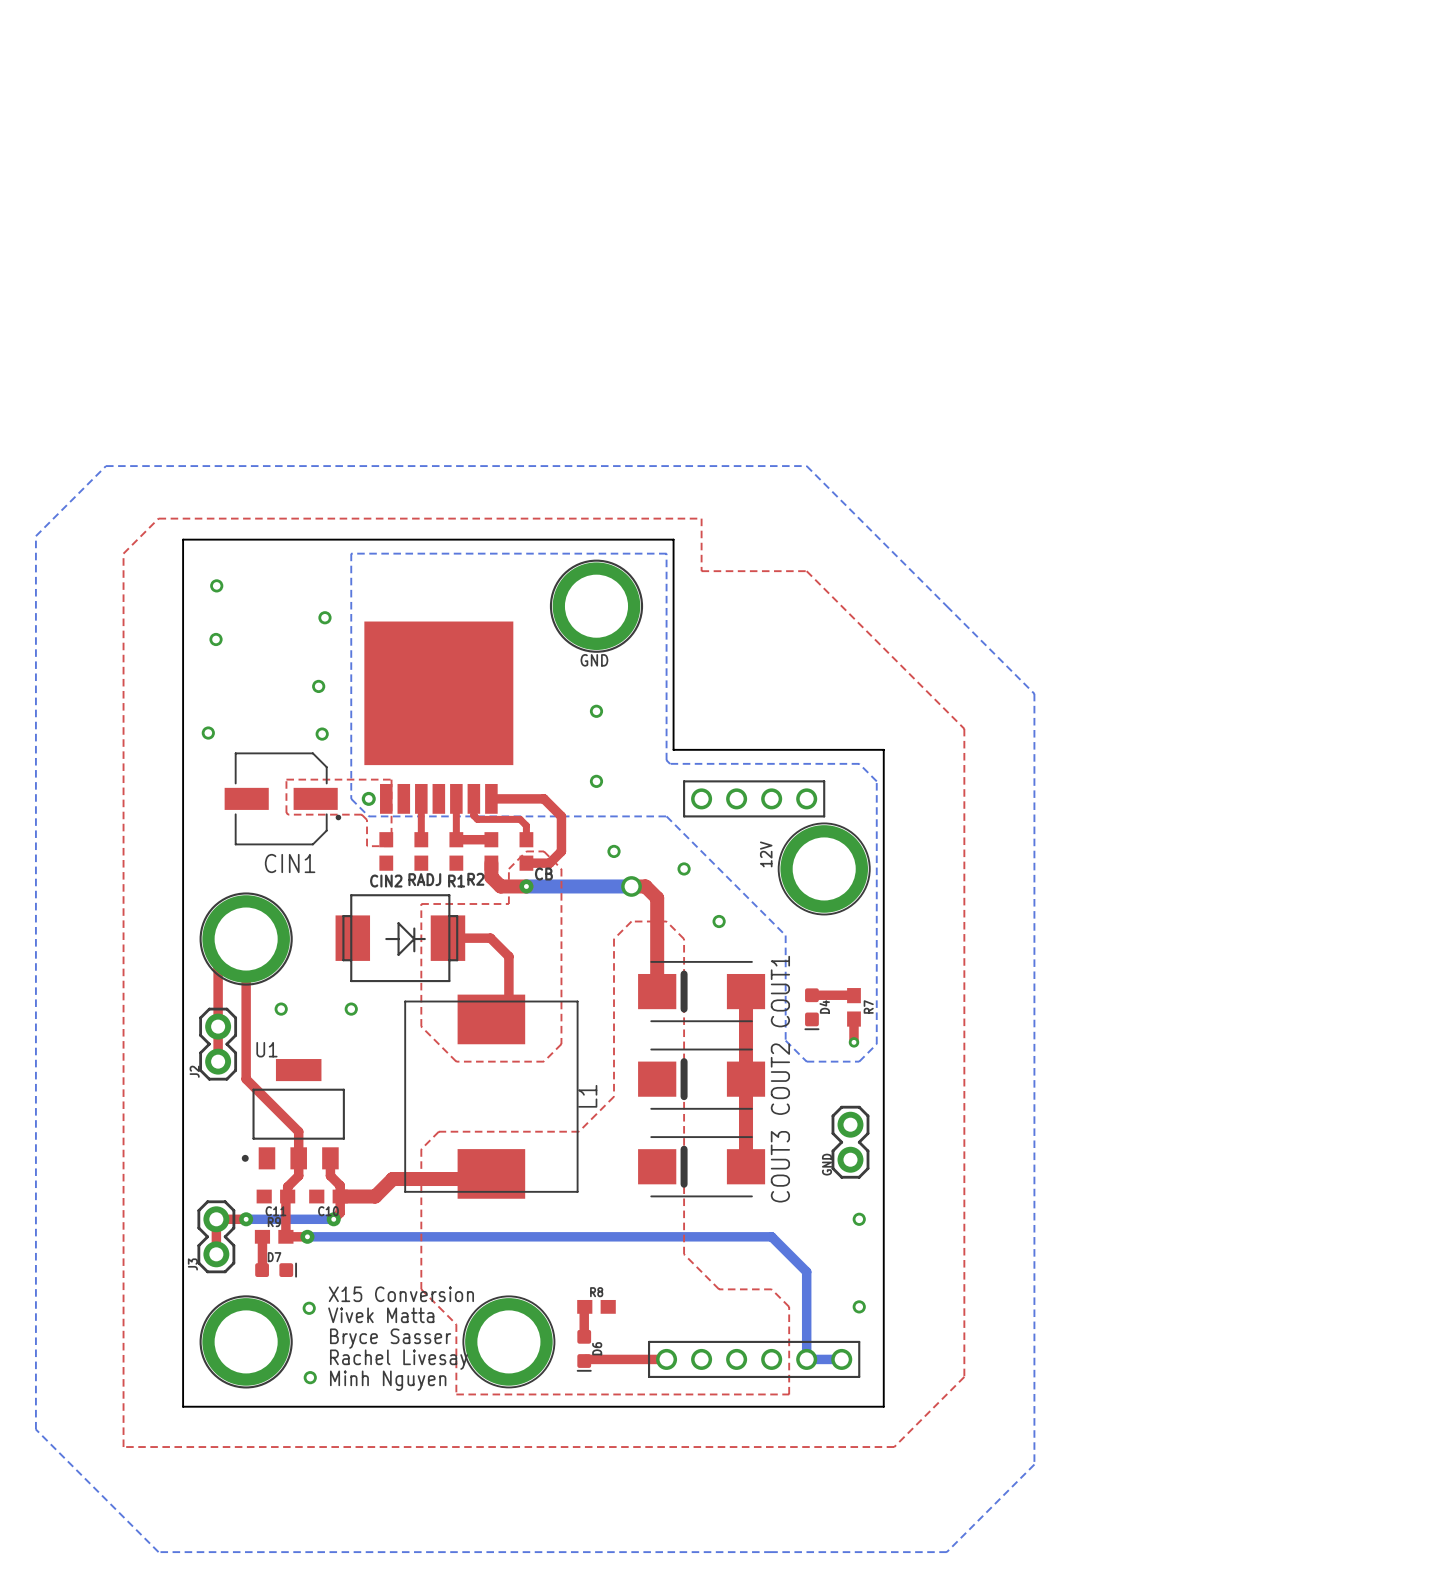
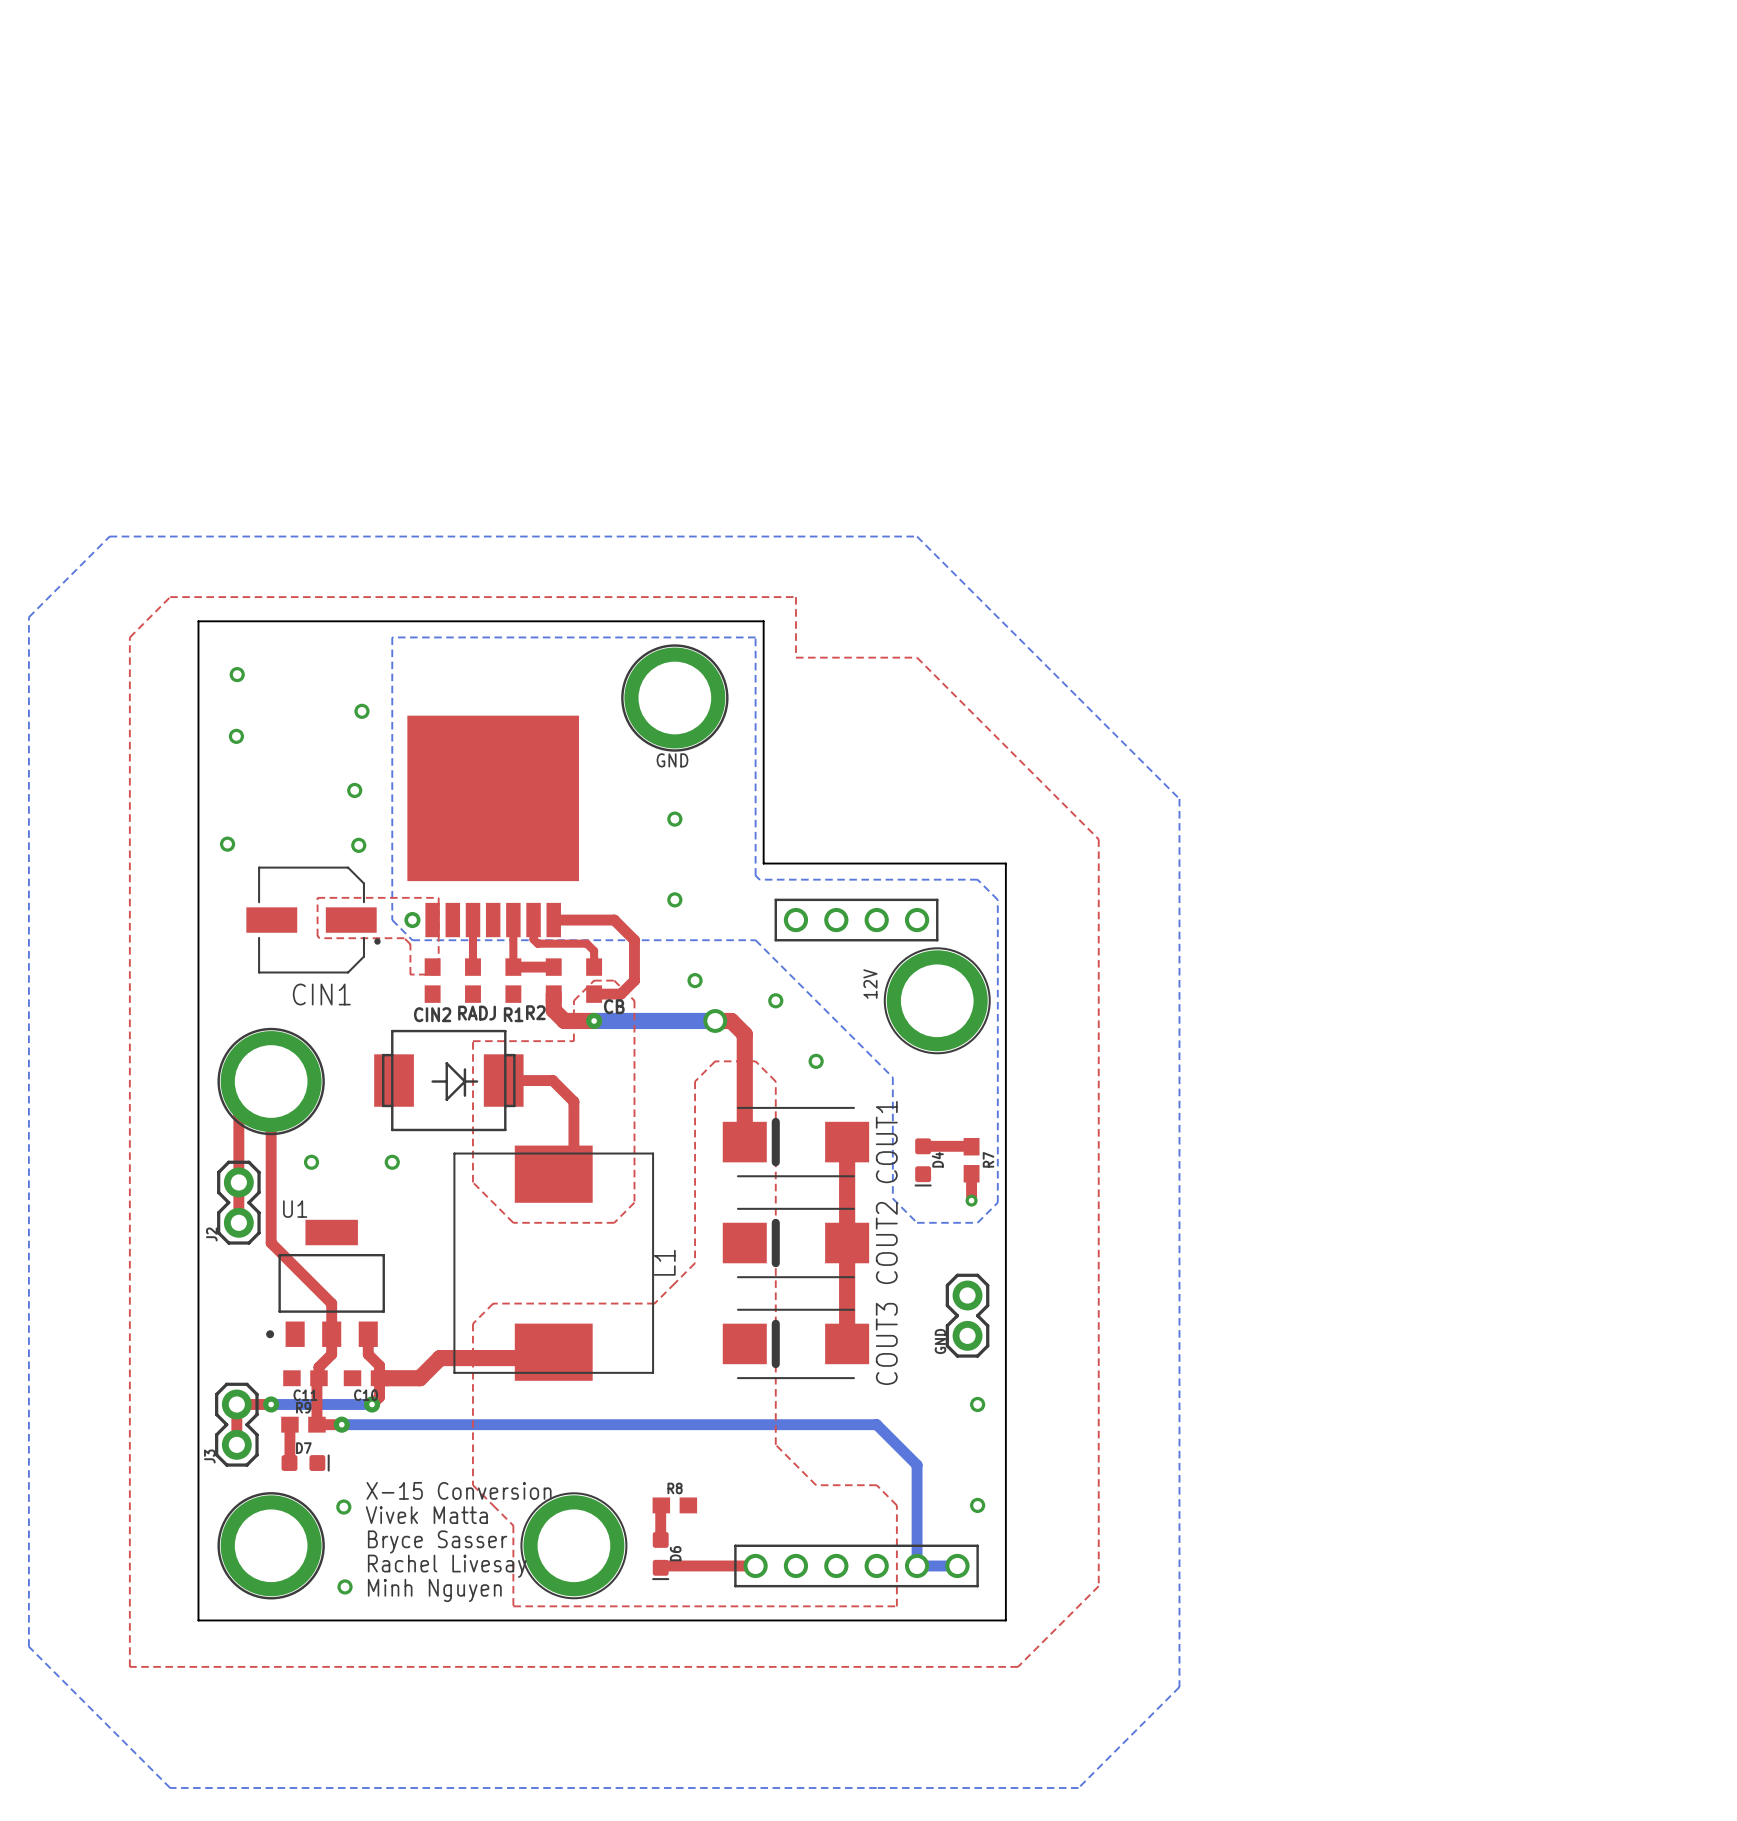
text: X15 Conversion (401, 1294) -> X-15 Conversion (459, 1490)

